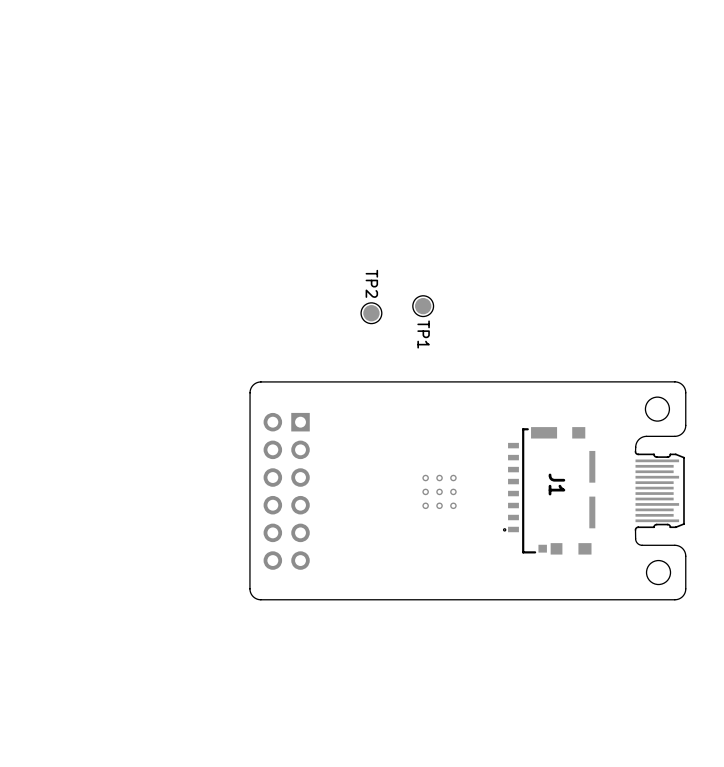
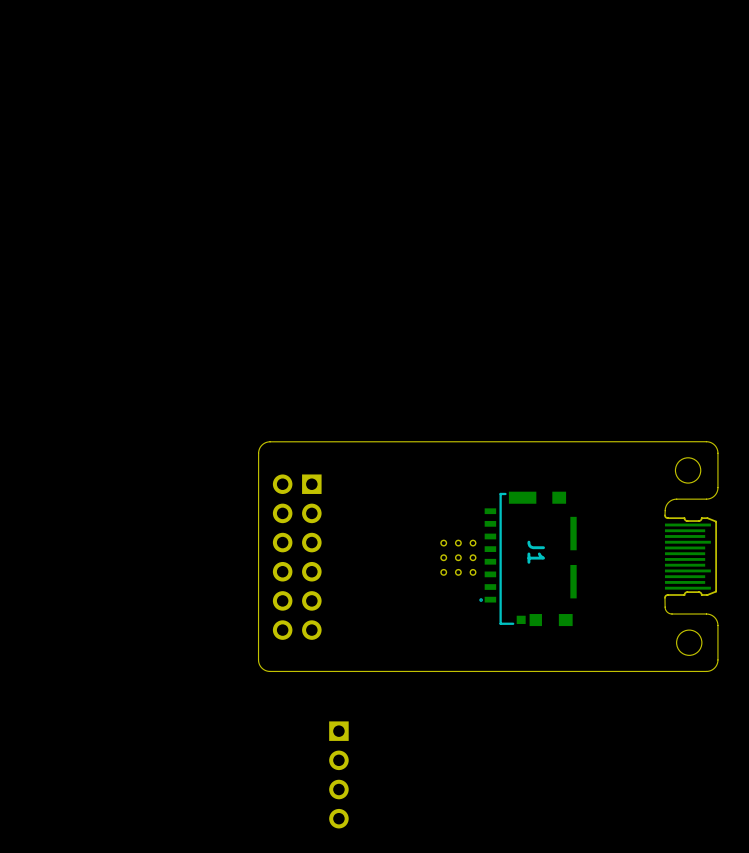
TP1: (423, 306) -> none
TP2: (371, 313) -> none
J1 position: (549, 490) -> (527, 558)
part: none -> (338, 774)

